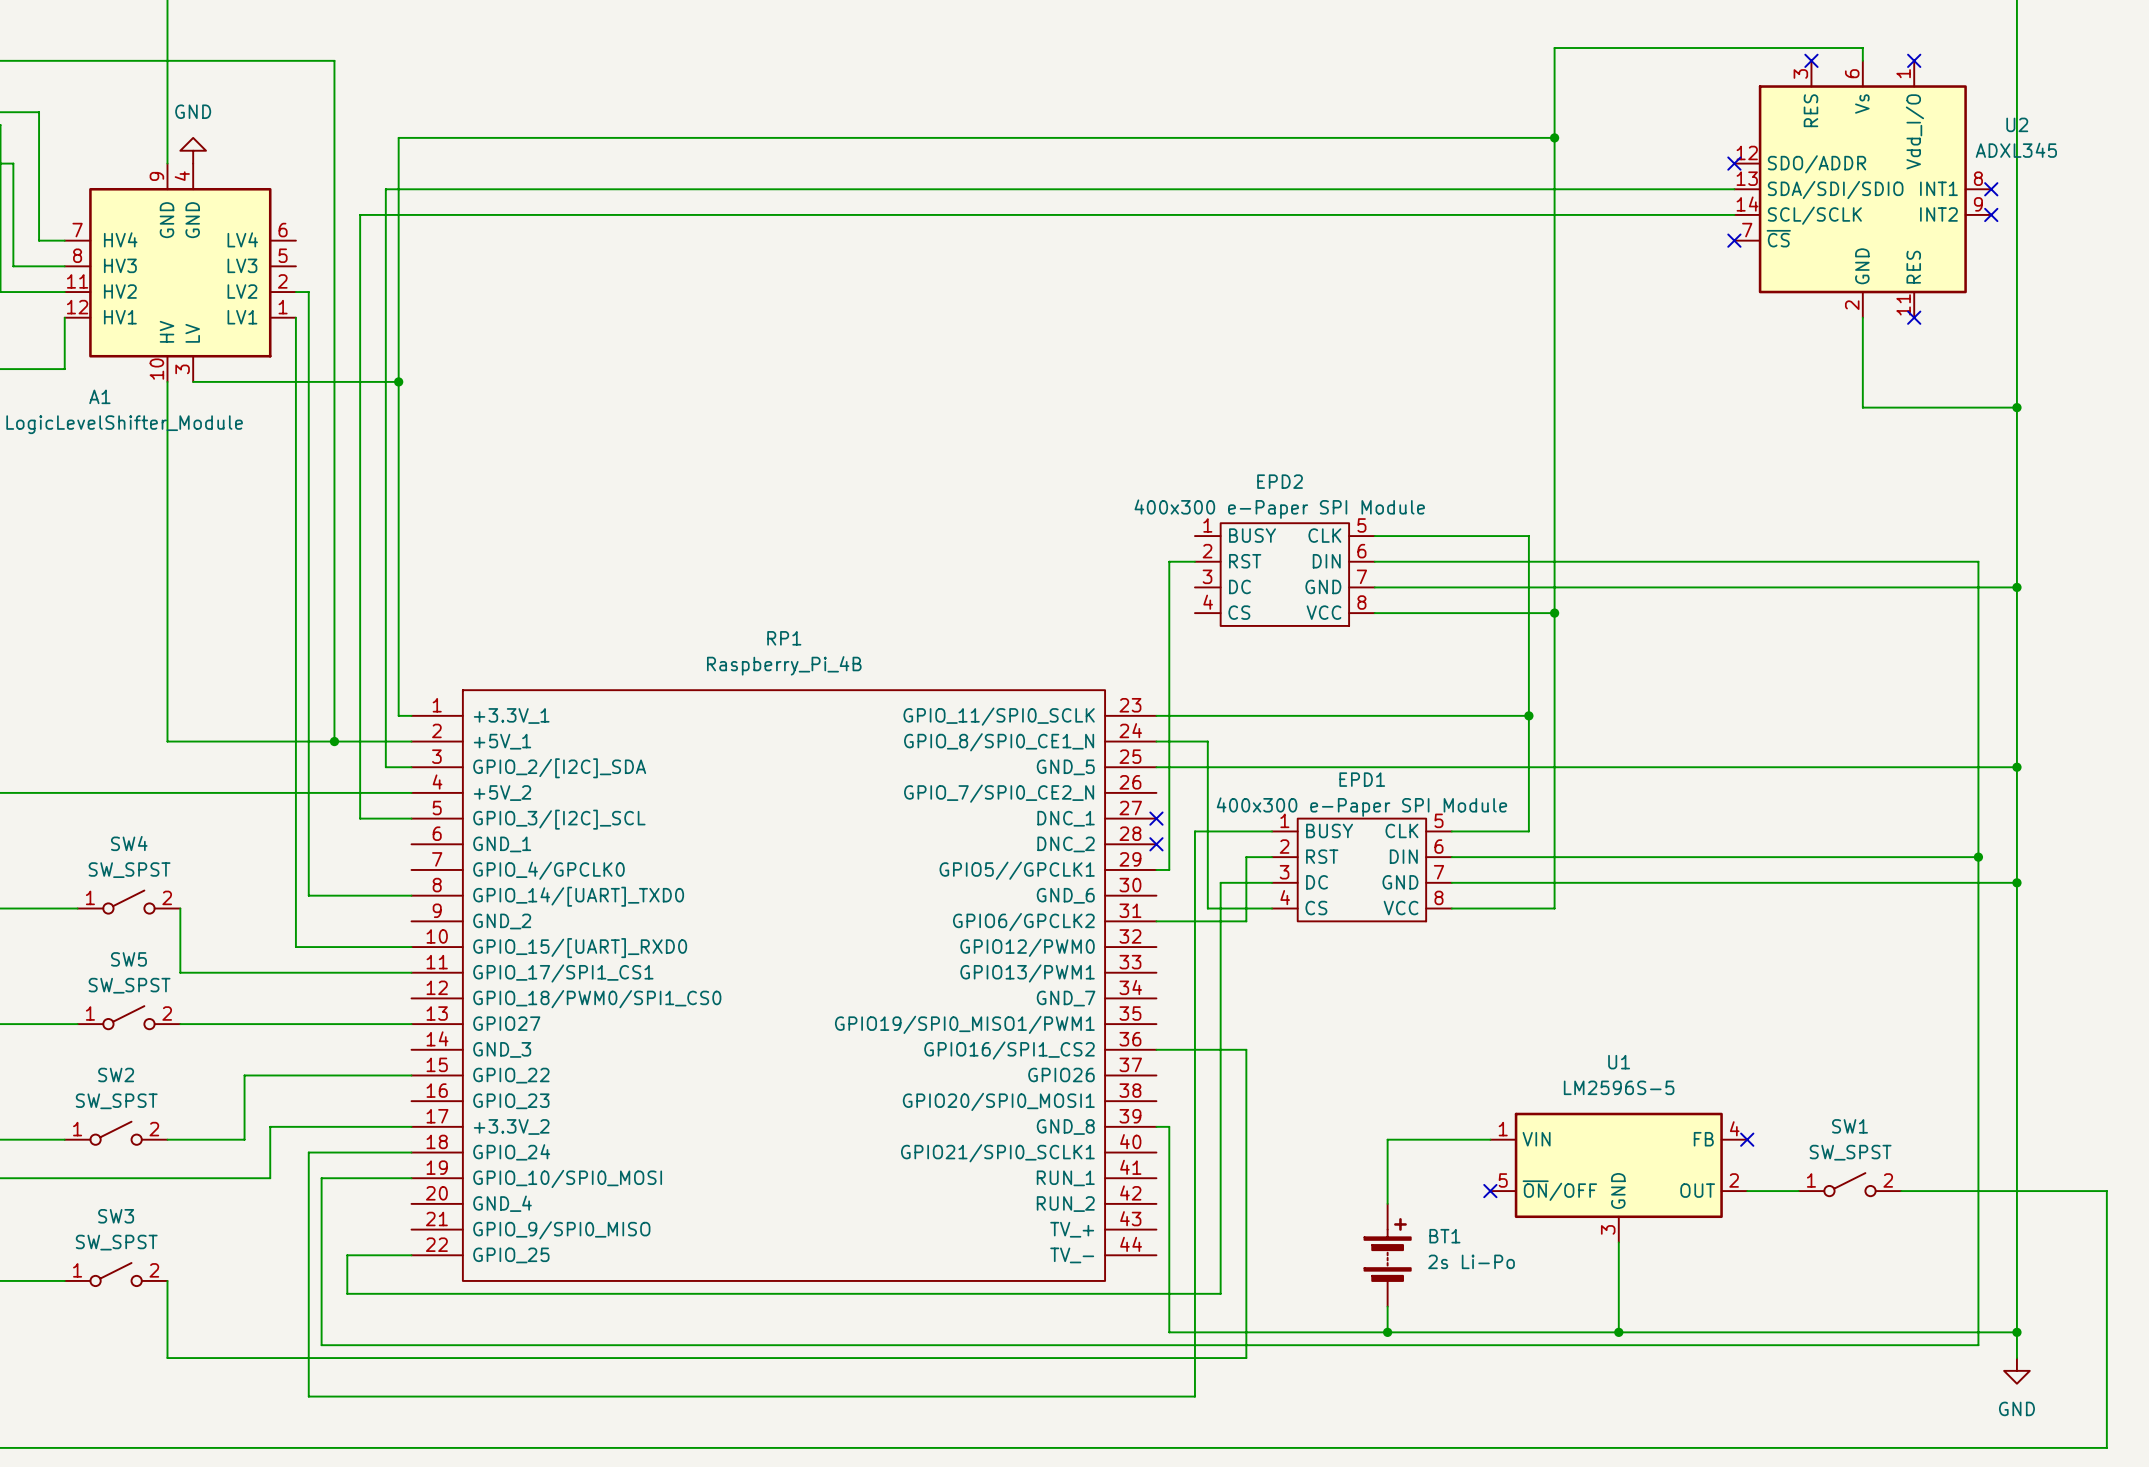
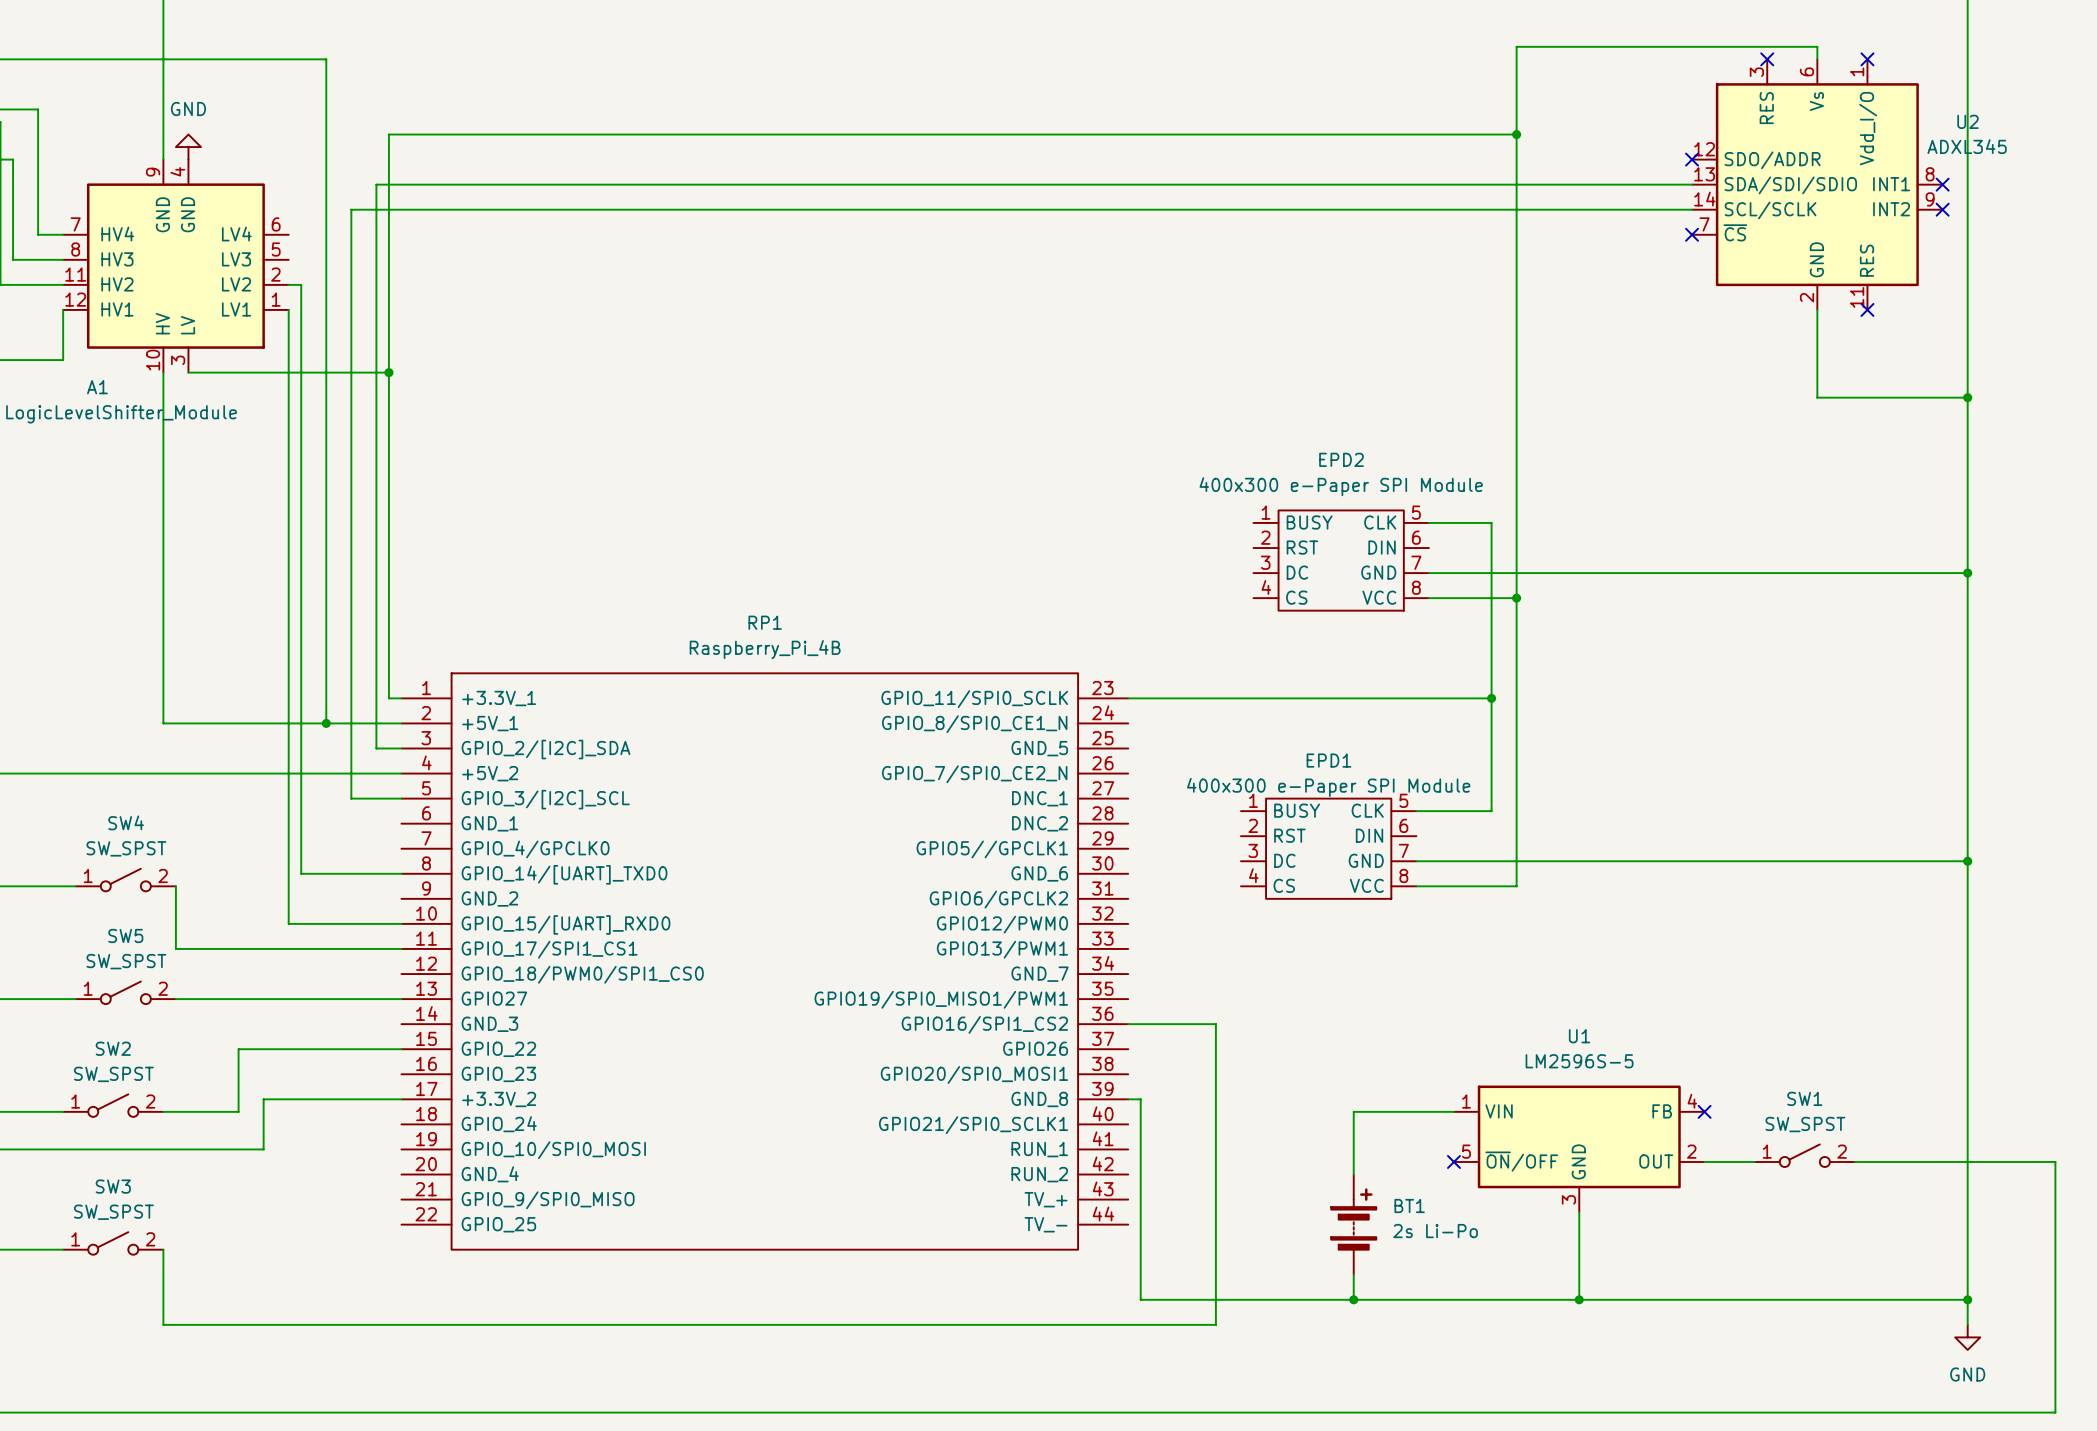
EPD2 name position: EPD2 (1280, 481) -> EPD2 (1341, 459)
EPD2 value position: 400x300 e-Paper SPI Module (1279, 509) -> 400x300 e-Paper SPI Module (1341, 486)
wire: (1374, 536) (1464, 536) -> none
wire: (1194, 561) (1169, 561) (1169, 869) (1156, 869) -> none
wire: (1374, 561) (1978, 561) (1978, 1345) (321, 1345) (321, 1178) (411, 1178) -> none
EPD2 position: (1284, 574) -> (1341, 560)
wire: (1374, 587) (1464, 587) -> none
wire: (1374, 613) (1464, 613) -> none
wire: (1156, 741) (1207, 741) (1207, 908) (1272, 908) -> none
wire: (1156, 767) (2016, 767) -> none
junction: (2016, 767) -> none
no-connect mark: (1156, 818) -> none
wire: (1272, 831) (1194, 831) (1194, 1396) (308, 1396) (308, 1152) (411, 1152) -> none
no-connect mark: (1156, 844) -> none
wire: (1272, 857) (1246, 857) (1246, 921) (1156, 921) -> none
wire: (1451, 857) (1978, 857) -> none
junction: (1978, 857) -> none
wire: (1272, 882) (1220, 882) (1220, 1293) (347, 1293) (347, 1255) (411, 1255) -> none

